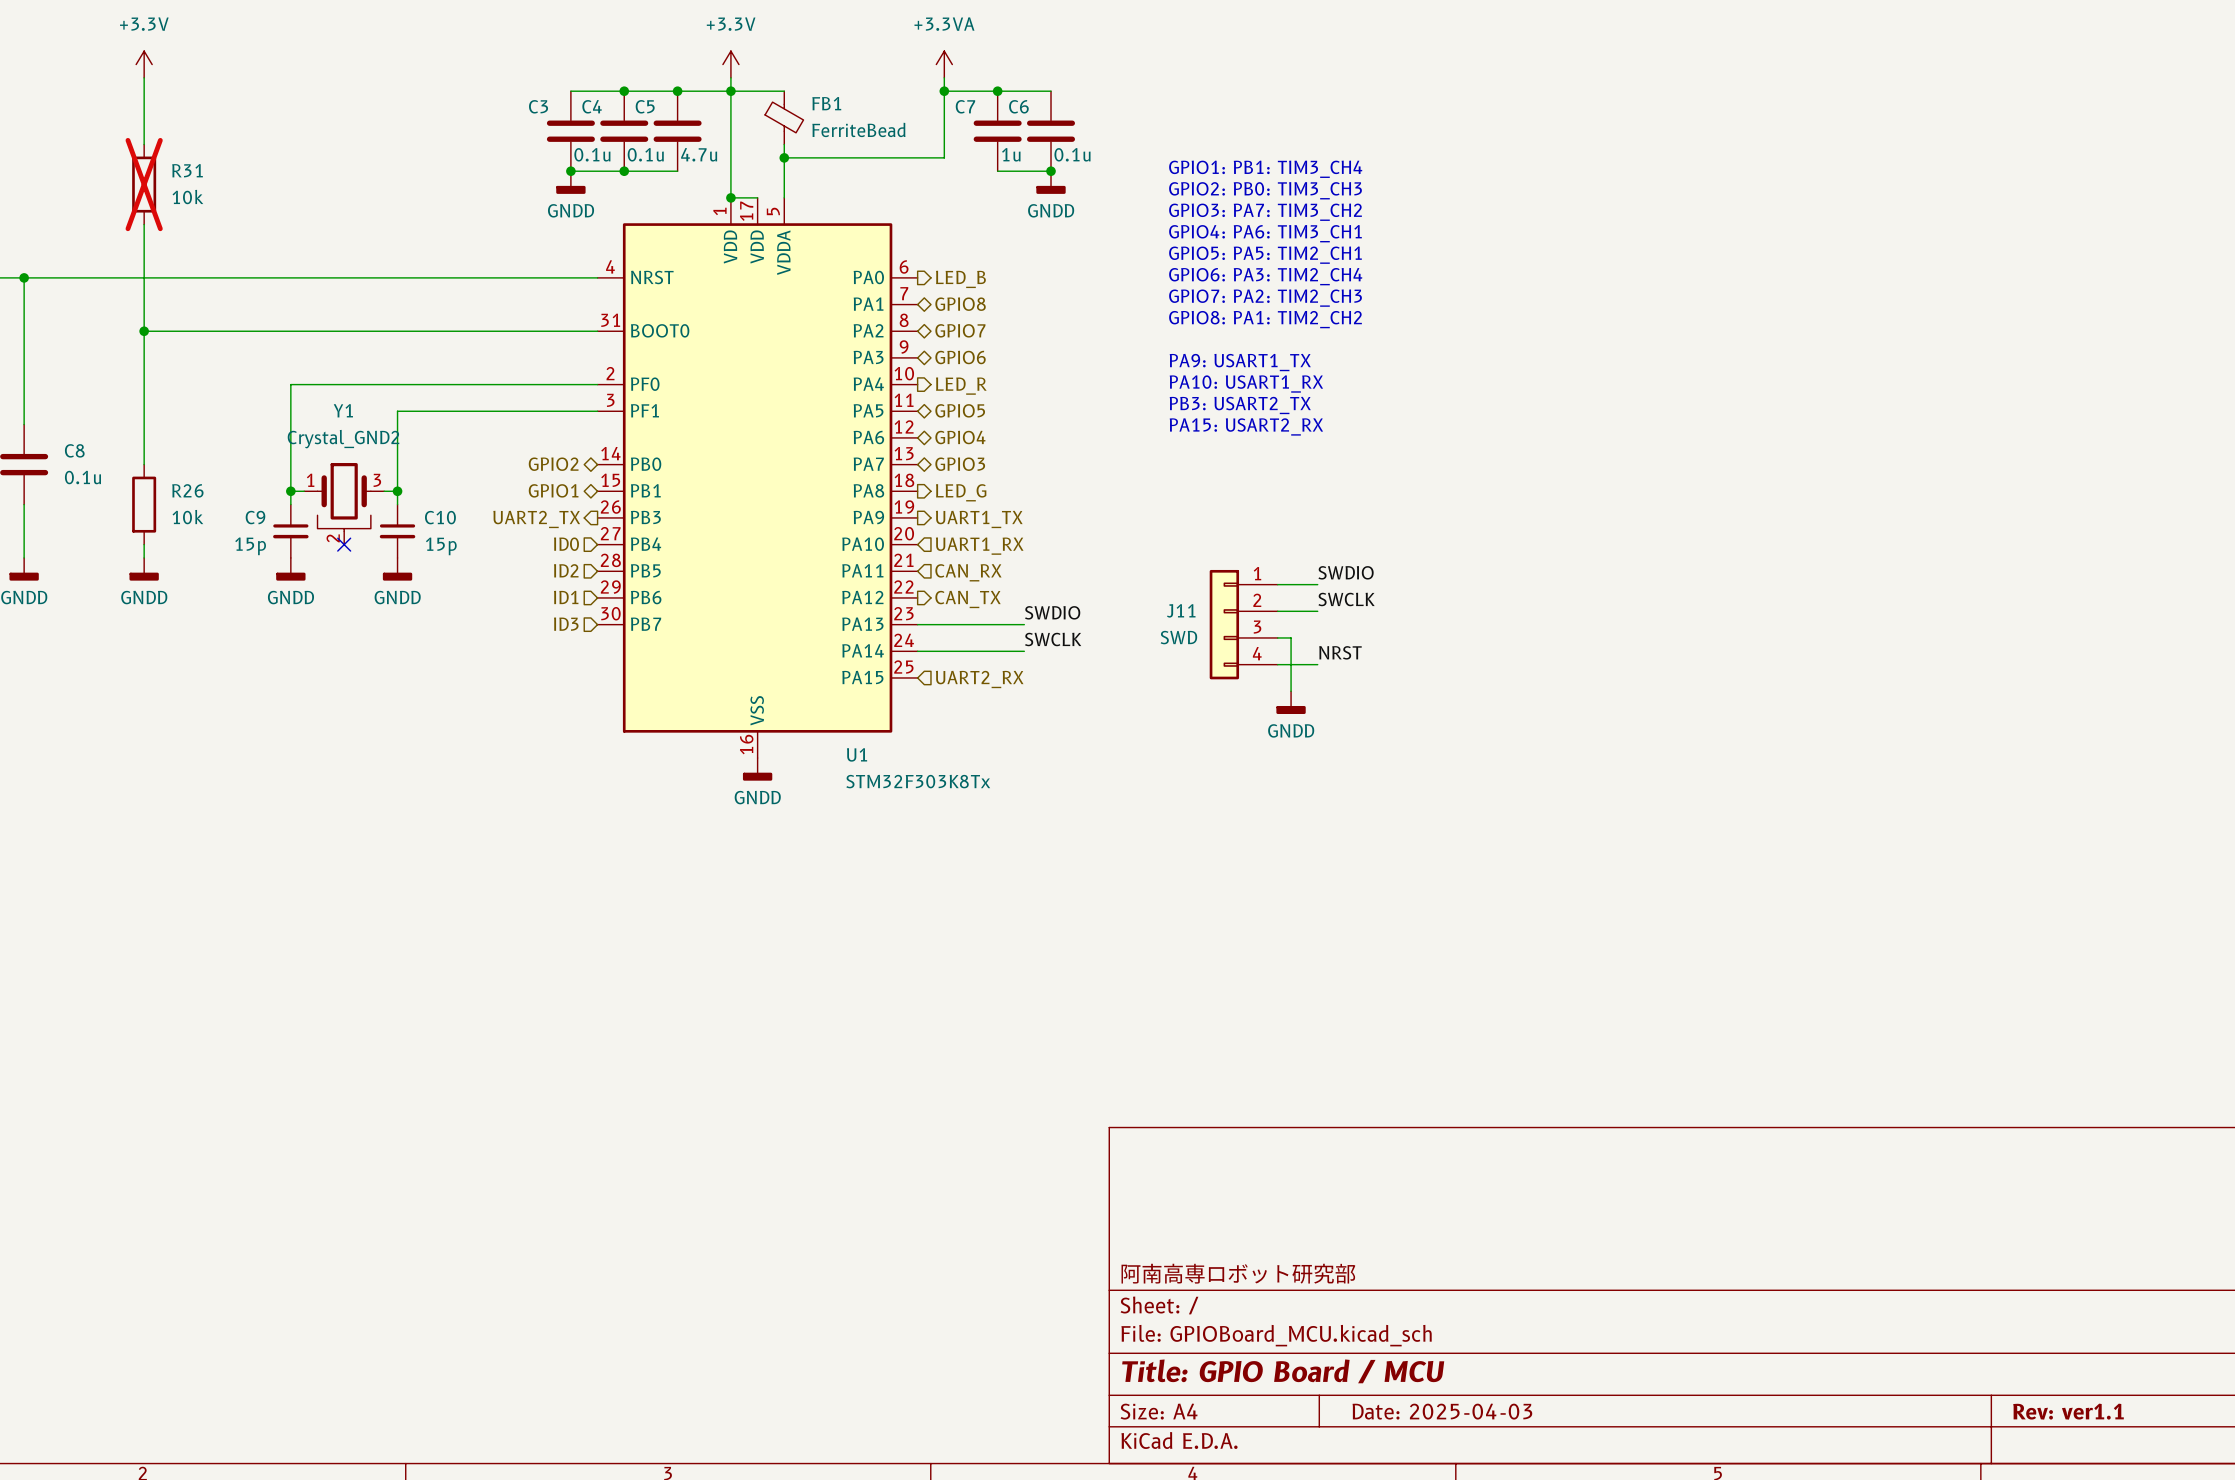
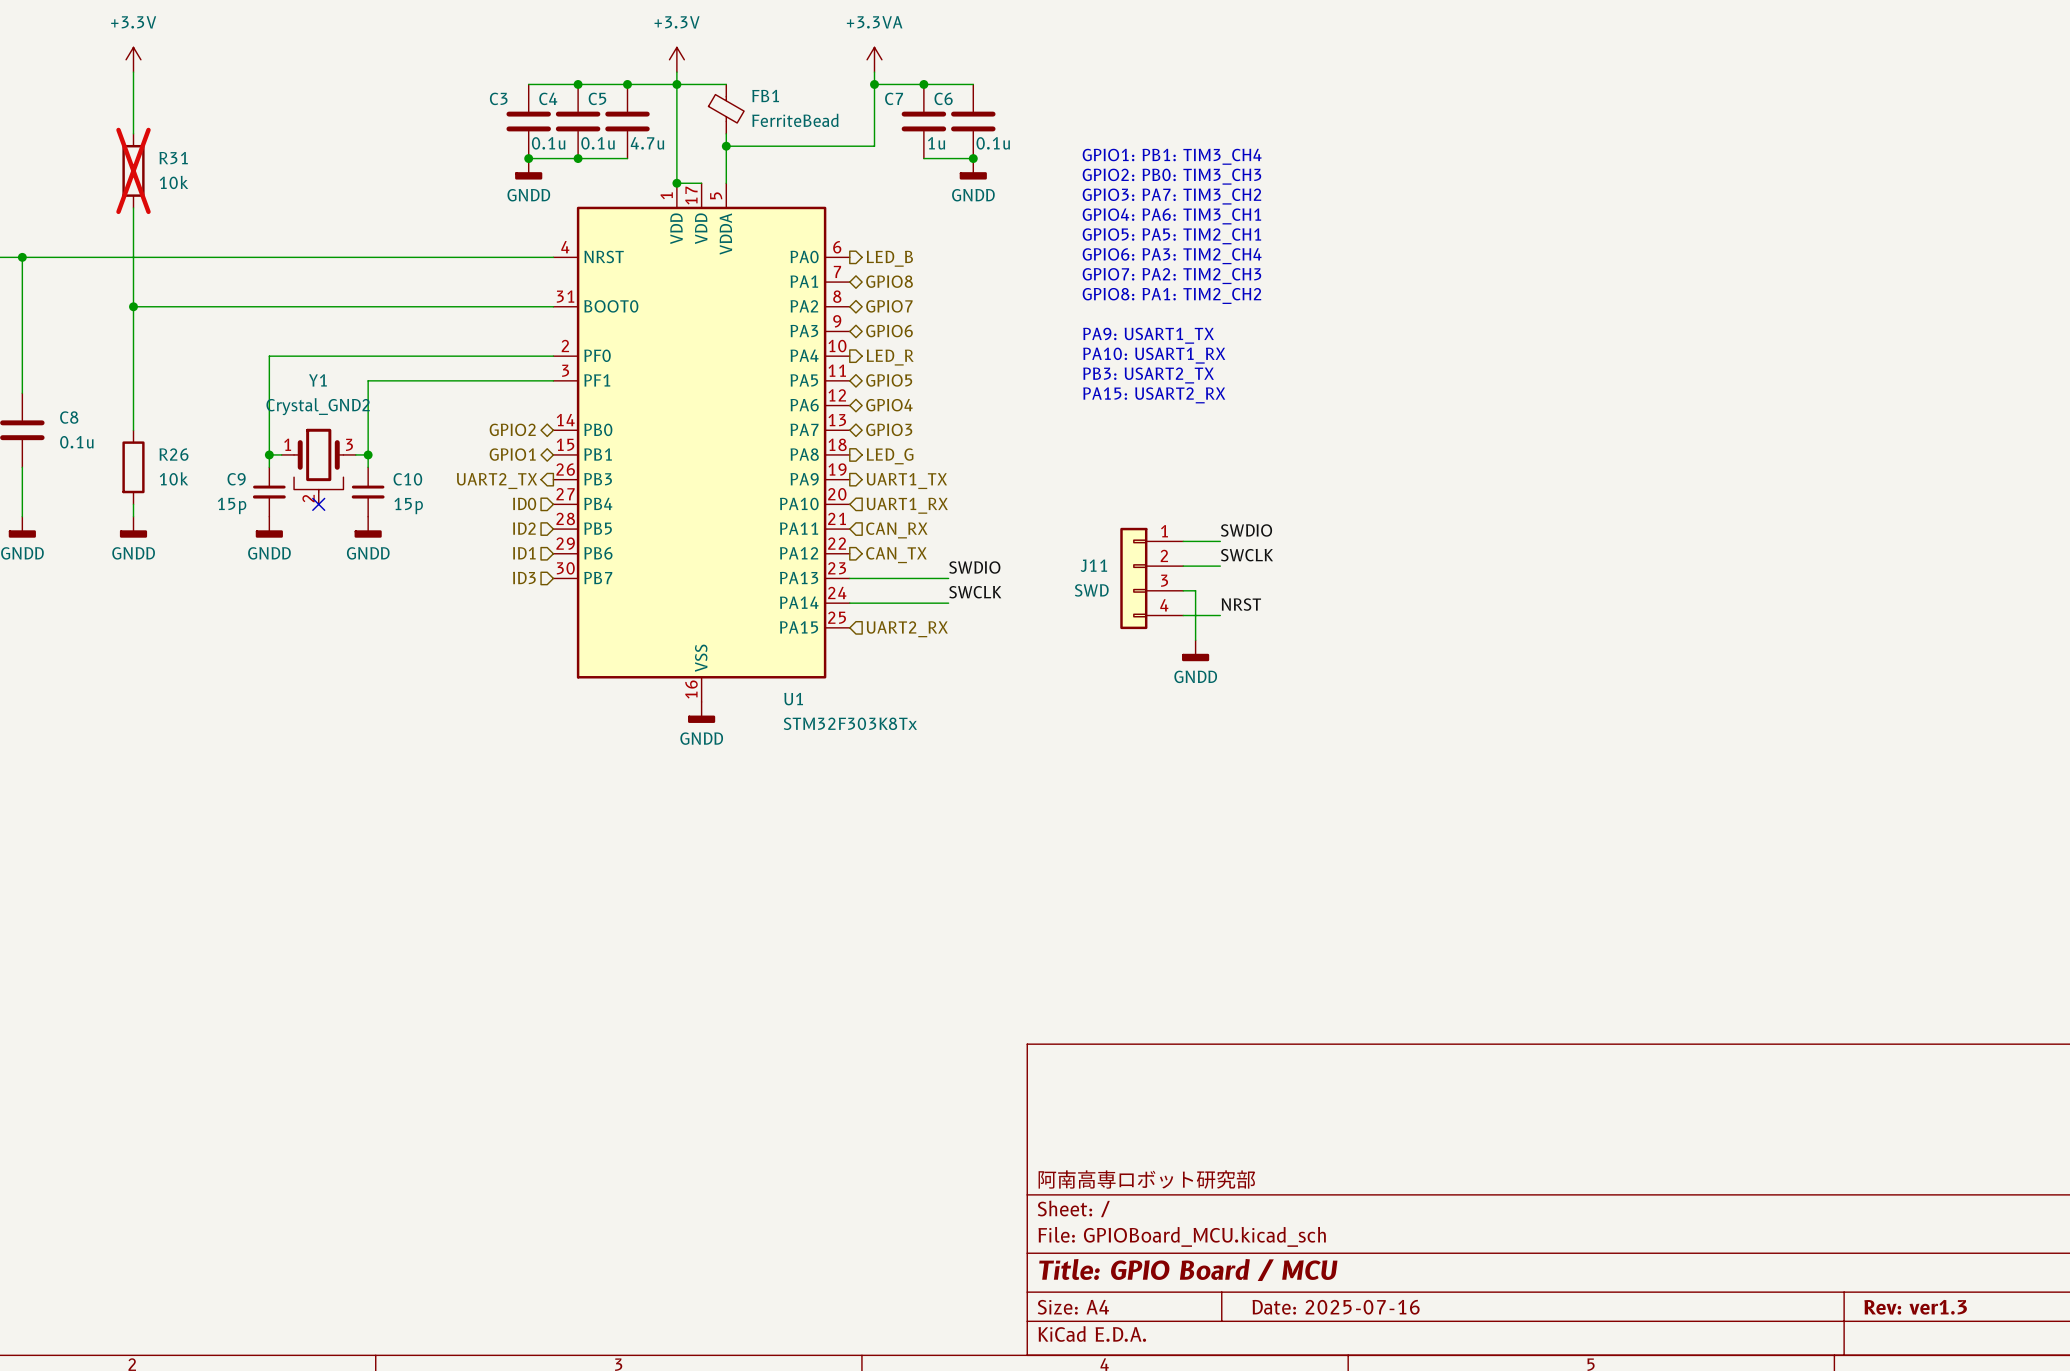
title block: Date: 2025-04-03 (1442, 1411) -> Date: 2025-07-16 (1336, 1307)
title block: Rev: ver1.1 (2068, 1411) -> Rev: ver1.3 (1915, 1307)

